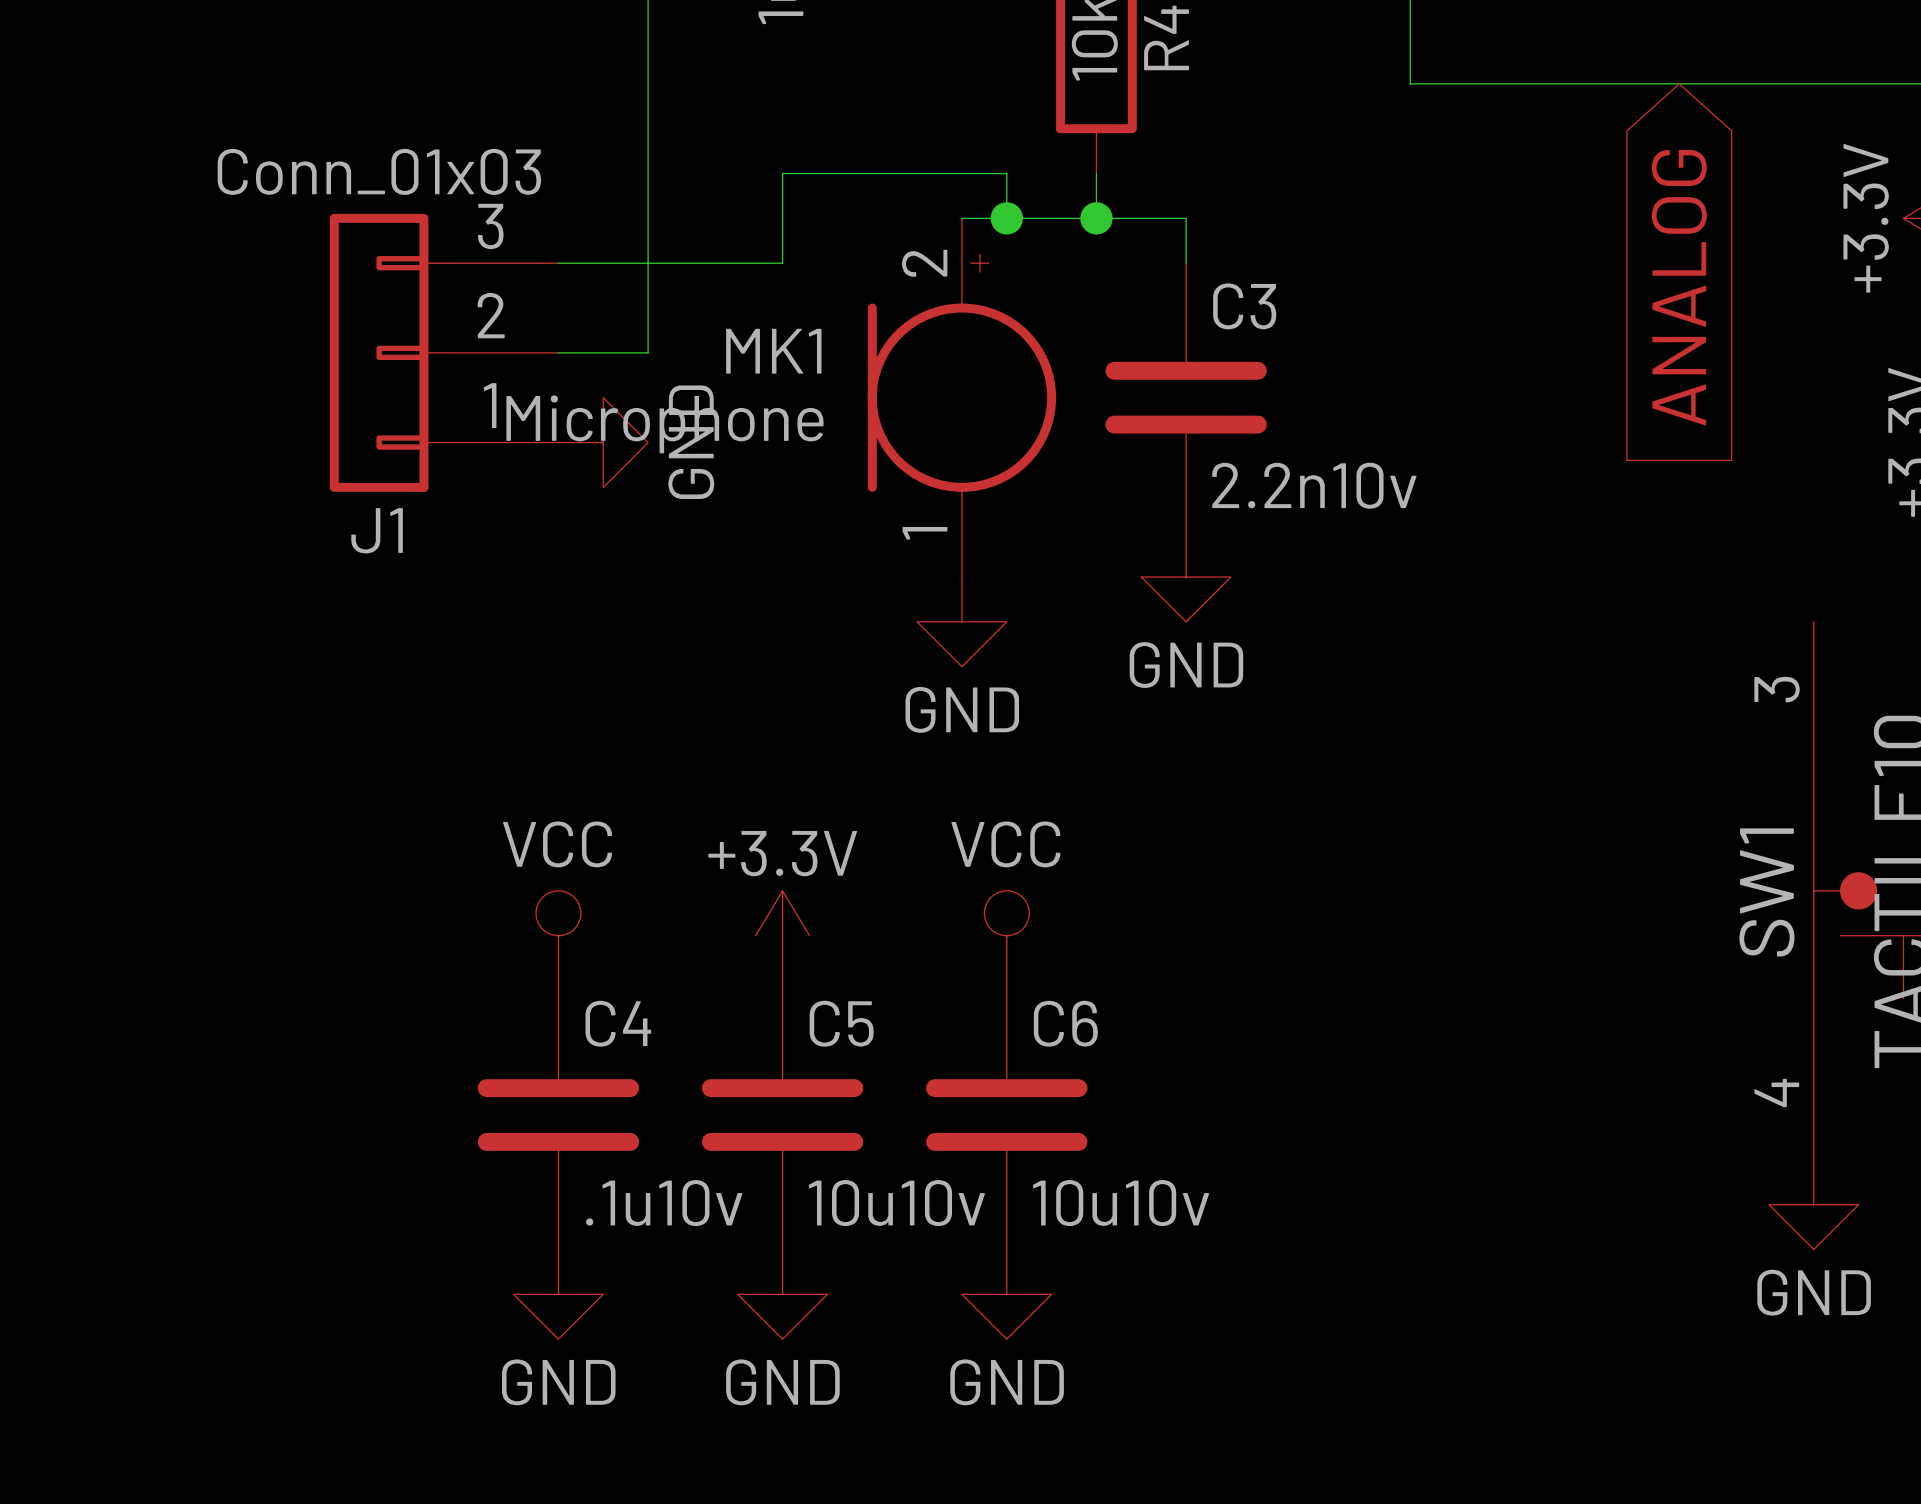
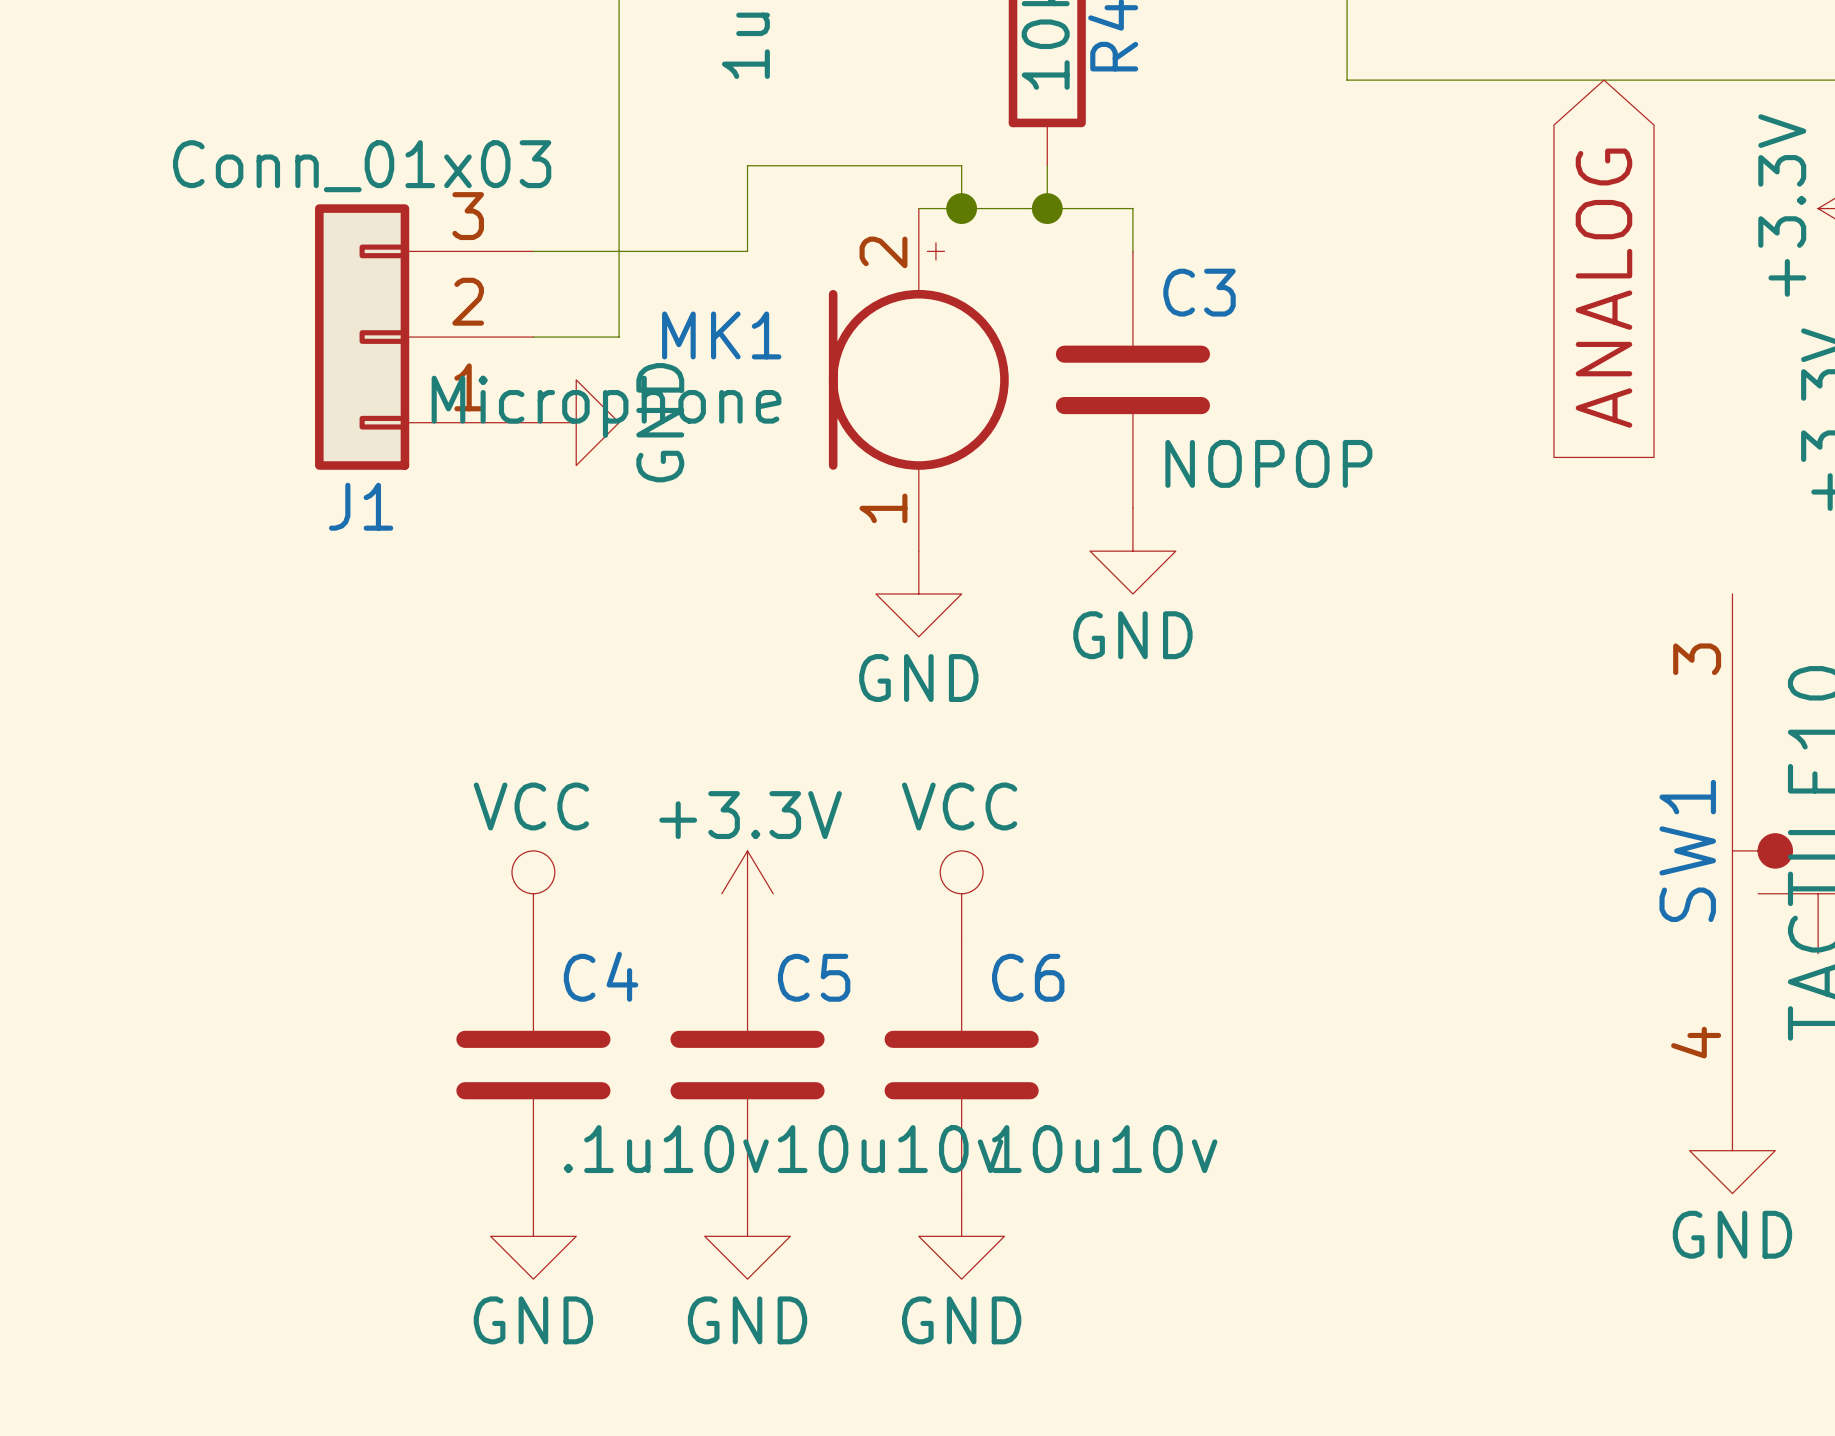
C3 value: 2.2n10v (1314, 485) -> NOPOP (1268, 463)

